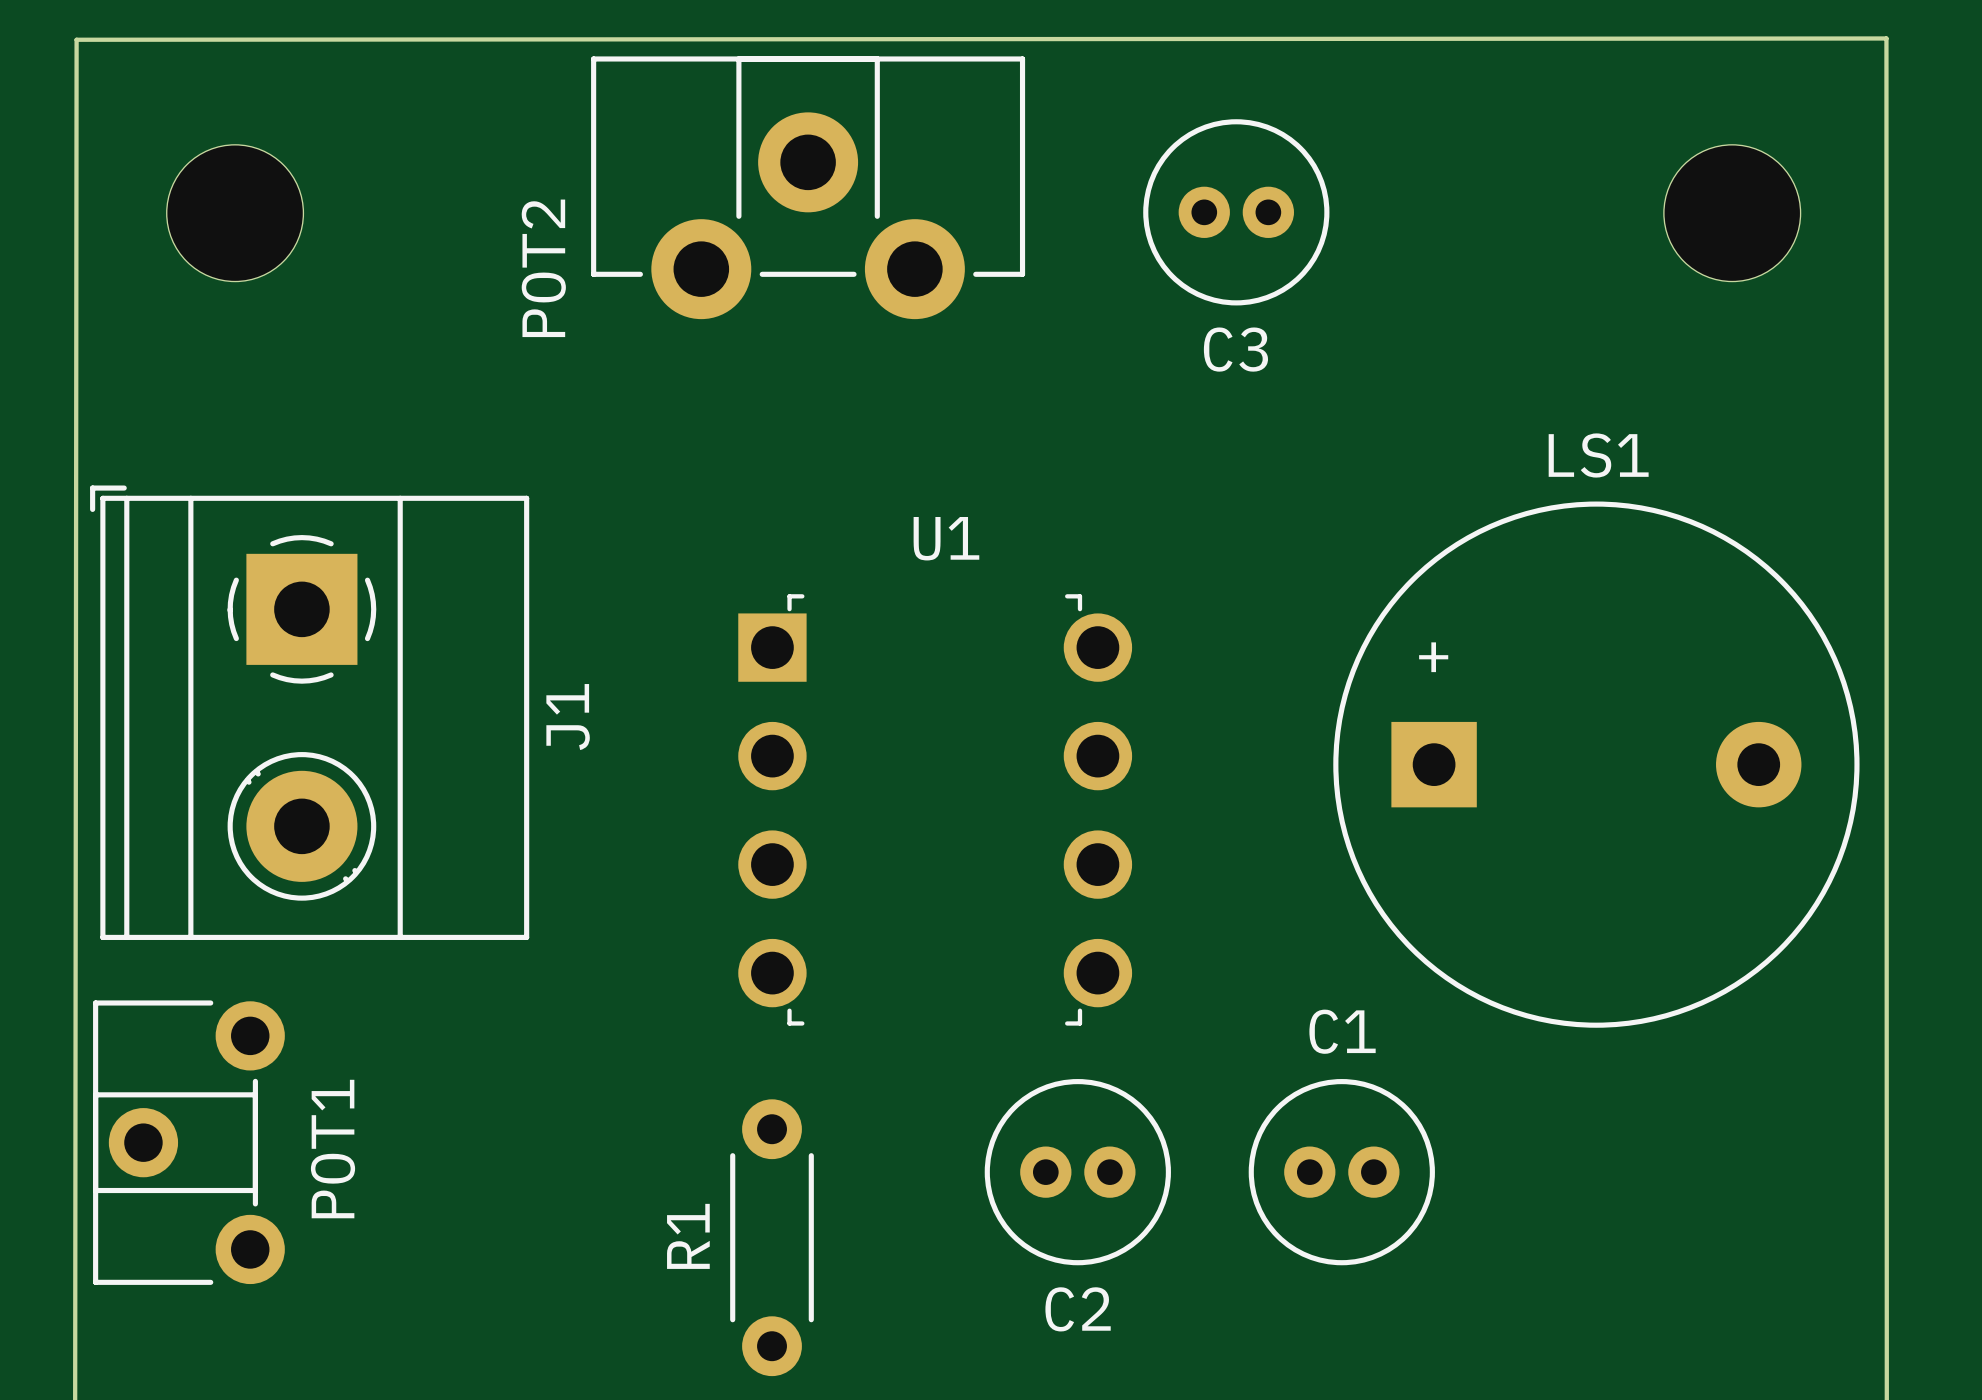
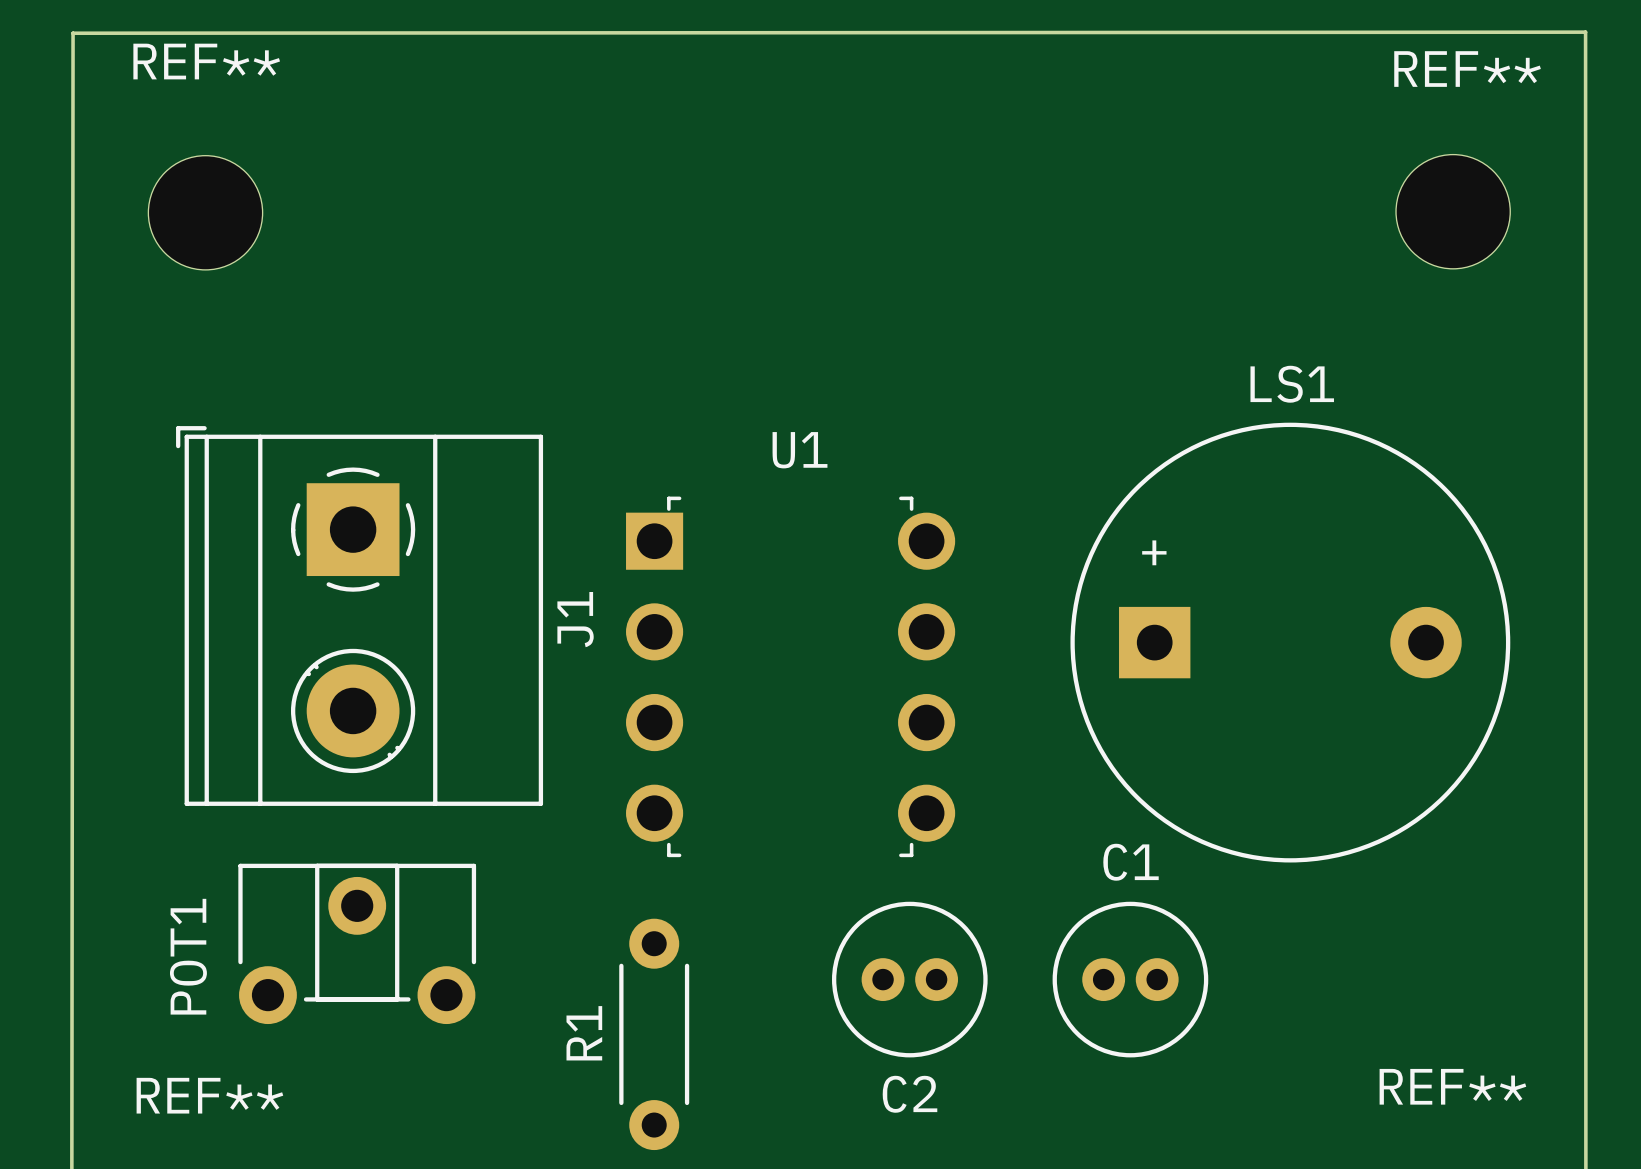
REF** name: none -> REF** (206, 61)
REF** name: none -> REF** (1467, 69)
POT2: (808, 187) -> none
C3: (1236, 212) -> none
REF** position: (235, 213) -> (205, 212)
REF** position: (1732, 213) -> (1453, 211)
J1 position: (309, 712) -> (359, 616)
LS1 position: (1596, 764) -> (1290, 642)
POT1 rotation: 0° (188, 1142) -> 90° clockwise (357, 943)
POT1 position: (188, 1142) -> (357, 943)
POT1 name position: POT1 (333, 1149) -> POT1 (188, 956)
REF** name: none -> REF** (1452, 1086)
REF** name: none -> REF** (209, 1095)

